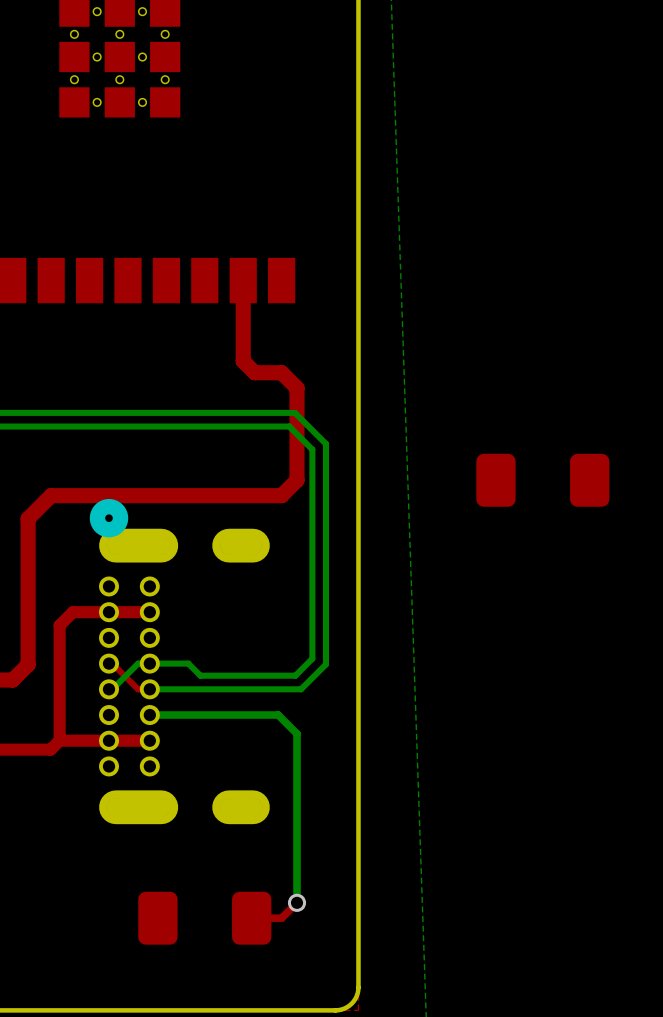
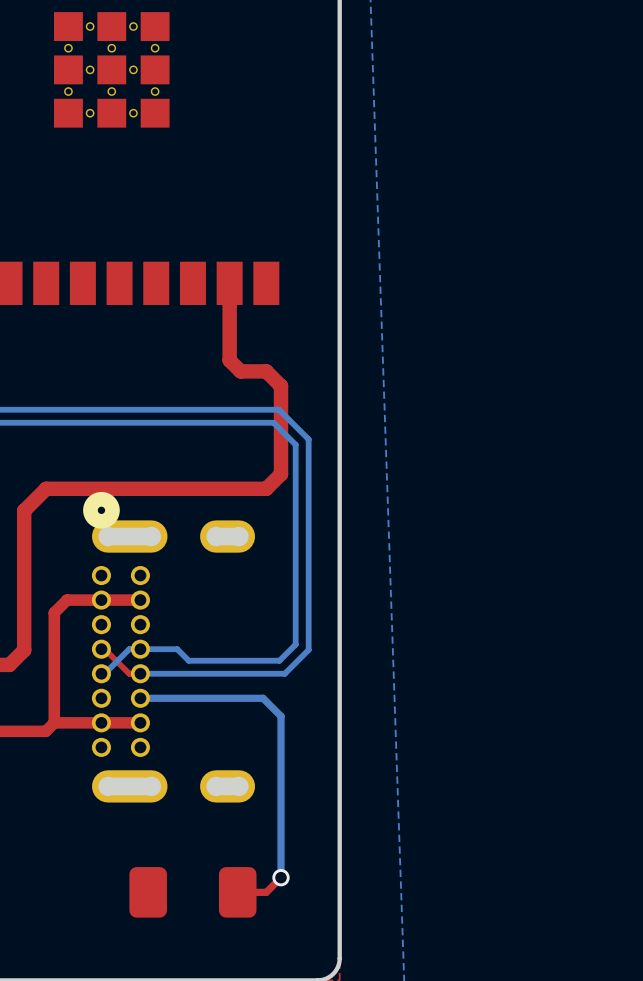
part: (542, 480) -> none

